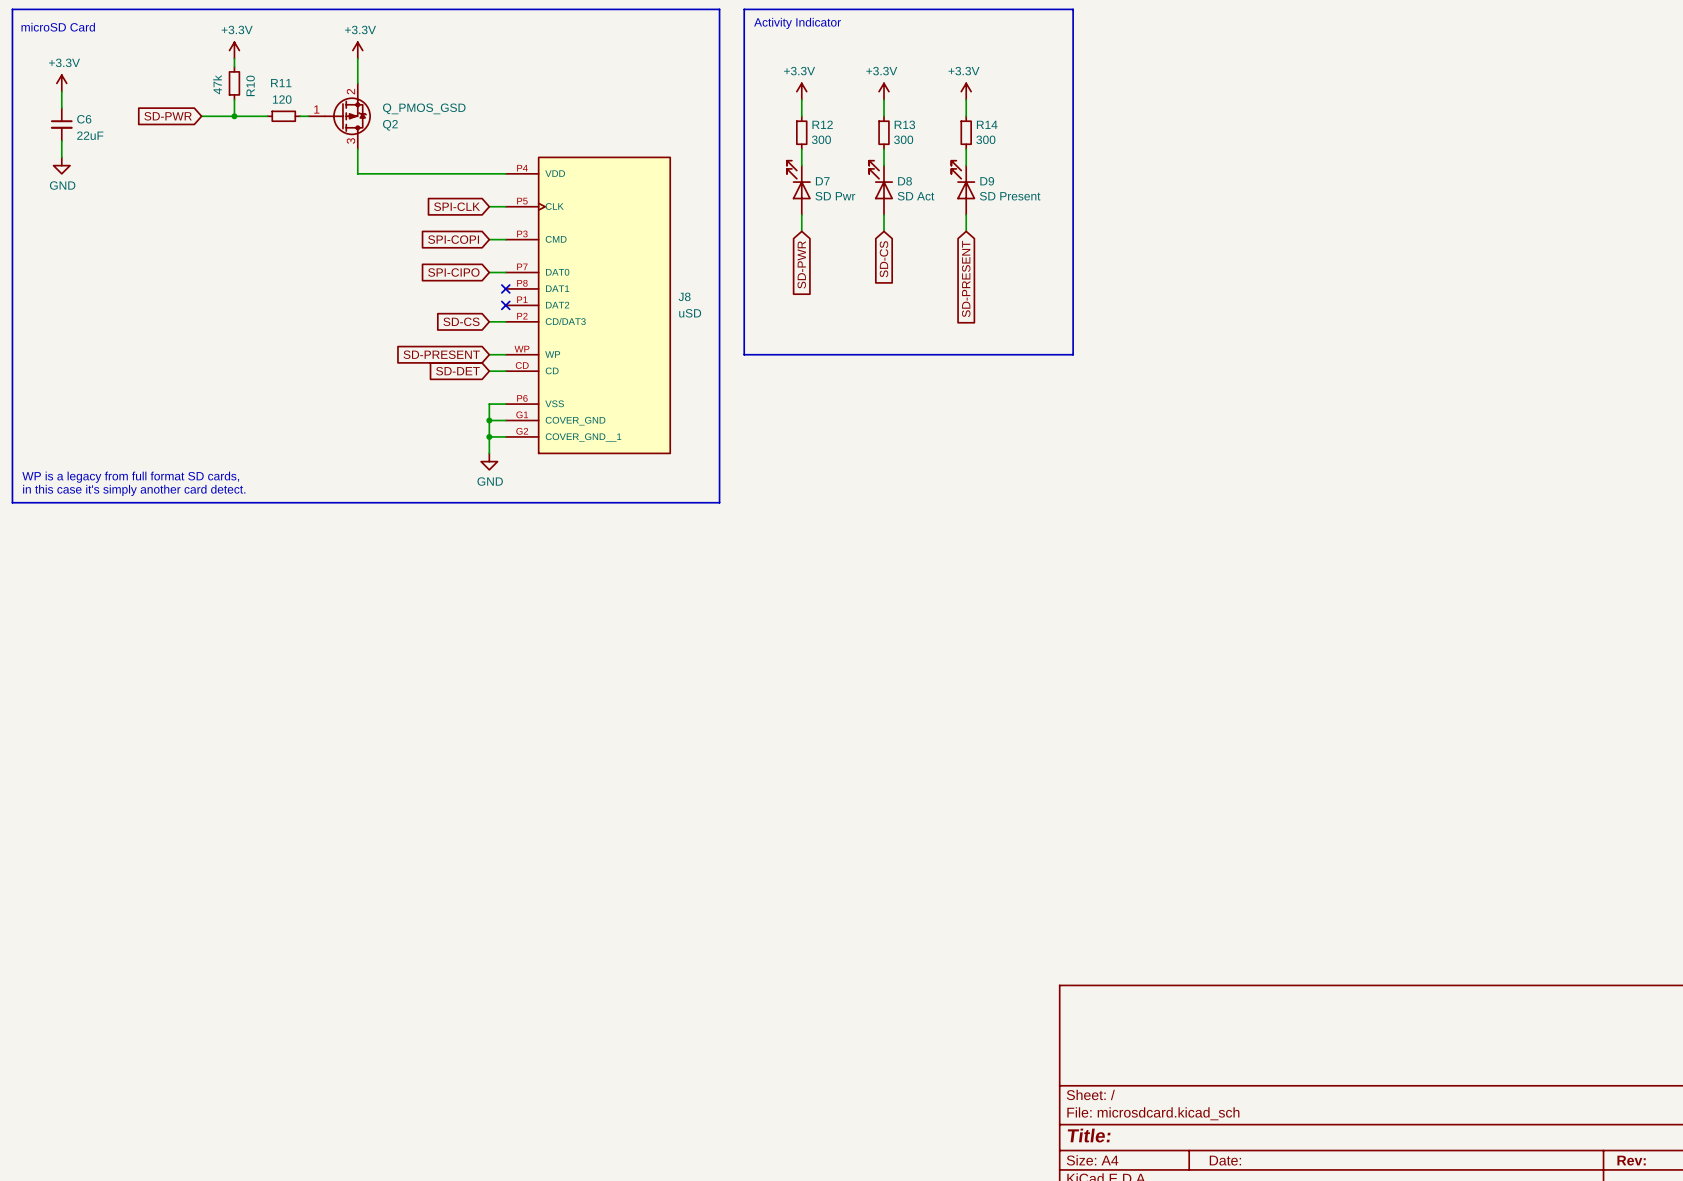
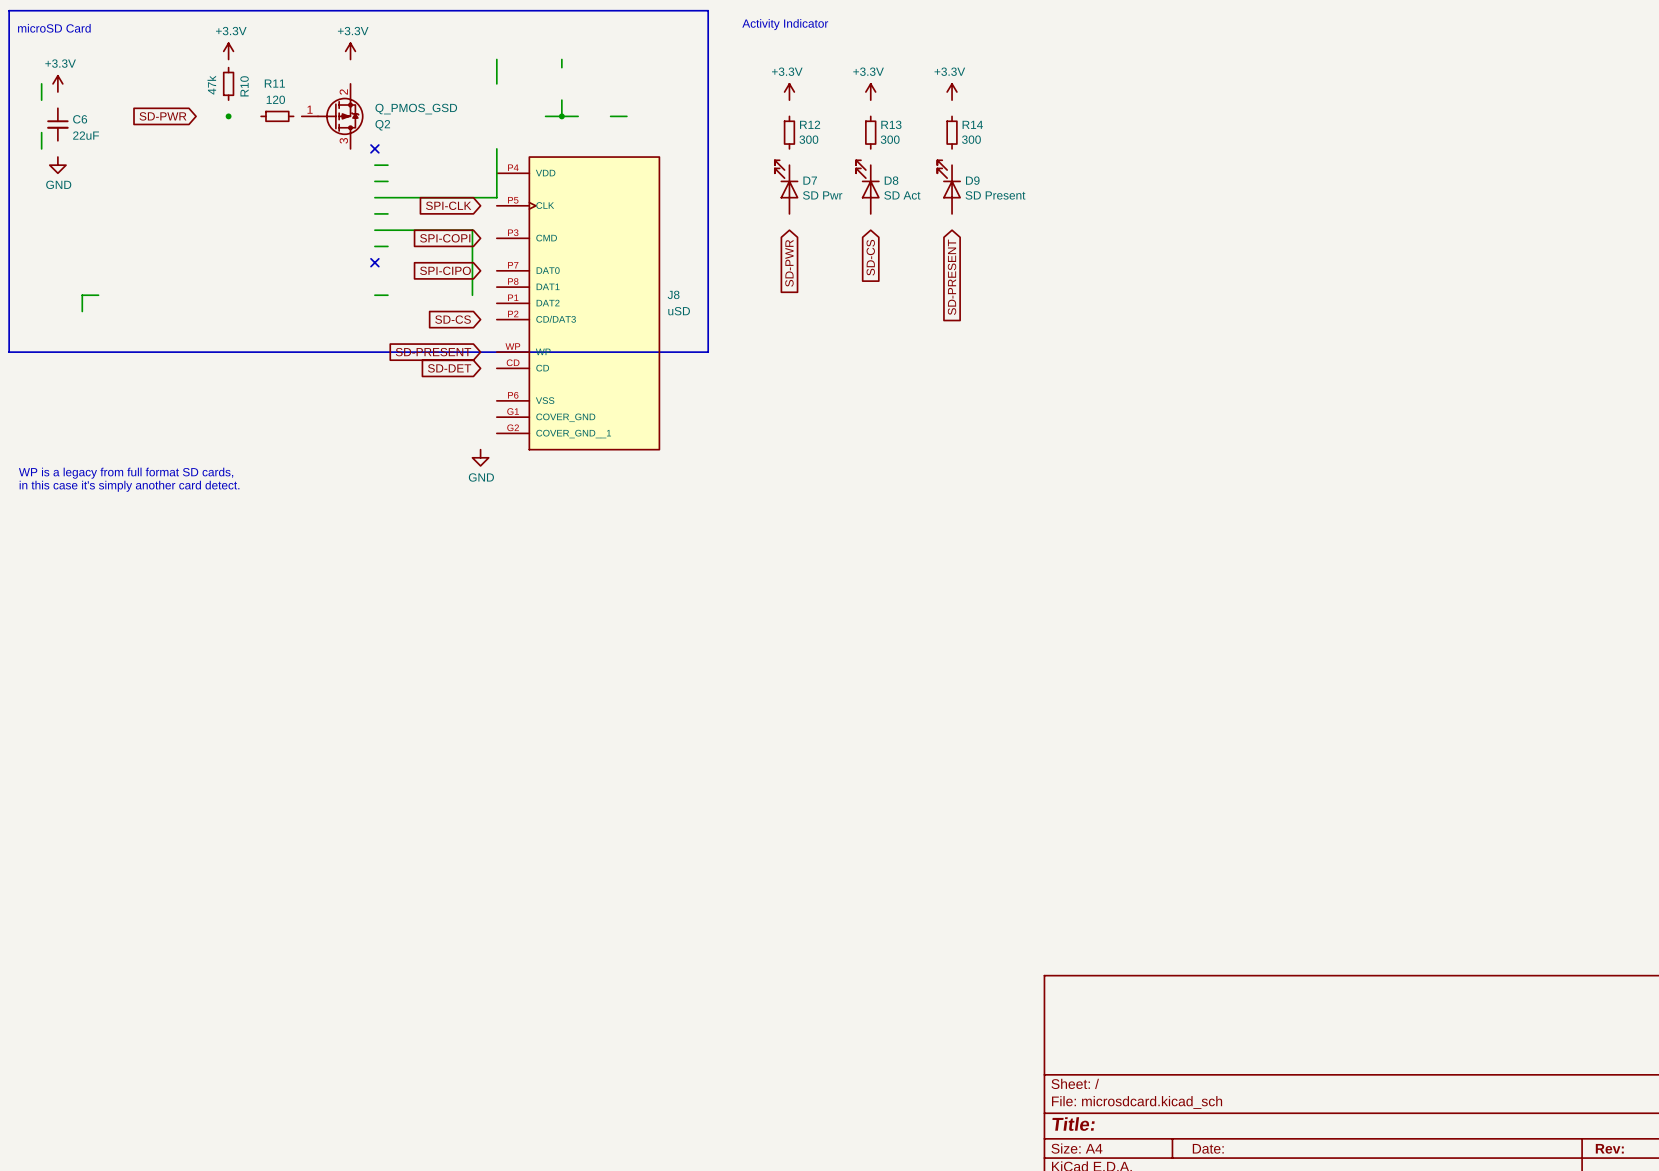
line: (744, 9) (1073, 9) (1073, 354) (744, 354) (744, 9) -> none
wire: (234, 58) (234, 66) -> none
wire: (357, 58) (357, 83) -> (496, 59) (496, 83)
wire: none -> (561, 59) (561, 67)
wire: (61, 91) (61, 108) -> (41, 83) (41, 100)
wire: (234, 99) (234, 116) -> none
wire: none -> (561, 100) (561, 116)
wire: (801, 99) (801, 116) -> none
wire: (883, 99) (883, 116) -> none
wire: (966, 99) (966, 116) -> none
wire: (201, 116) (267, 116) -> none
wire: (300, 116) (308, 116) -> none
wire: none -> (545, 116) (578, 116)
junction: none -> (561, 116)
wire: (61, 140) (61, 157) -> (41, 132) (41, 148)
wire: (357, 149) (357, 173) (505, 173) -> none
no-connect mark: none -> (374, 148)
wire: none -> (496, 148) (496, 197) (374, 197)
wire: (801, 149) (801, 165) -> none
wire: (883, 149) (883, 165) -> none
wire: (966, 149) (966, 165) -> none
wire: none -> (374, 165) (387, 165)
wire: none -> (374, 181) (387, 181)
wire: (489, 206) (505, 206) -> (610, 116) (626, 116)
wire: none -> (374, 213) (387, 213)
wire: (801, 214) (801, 231) -> none
wire: (883, 214) (883, 231) -> none
wire: (966, 214) (966, 231) -> none
wire: none -> (374, 230) (472, 230) (472, 295)
wire: (489, 239) (505, 239) -> none
wire: none -> (374, 246) (387, 246)
no-connect mark: none -> (374, 262)
wire: (489, 272) (505, 272) -> none
no-connect mark: (505, 288) -> none
wire: none -> (98, 295) (82, 295) (82, 311)
wire: none -> (374, 295) (387, 295)
no-connect mark: (505, 305) -> none
wire: (489, 321) (505, 321) -> none
line: (12, 354) (12, 502) (719, 502) (719, 354) -> (9, 352) (708, 352)
wire: (489, 371) (505, 371) -> none
wire: (505, 404) (489, 404) (489, 453) -> none
wire: (489, 420) (505, 420) -> none
junction: (489, 420) -> none
wire: (489, 436) (505, 436) -> none
junction: (489, 436) -> none

